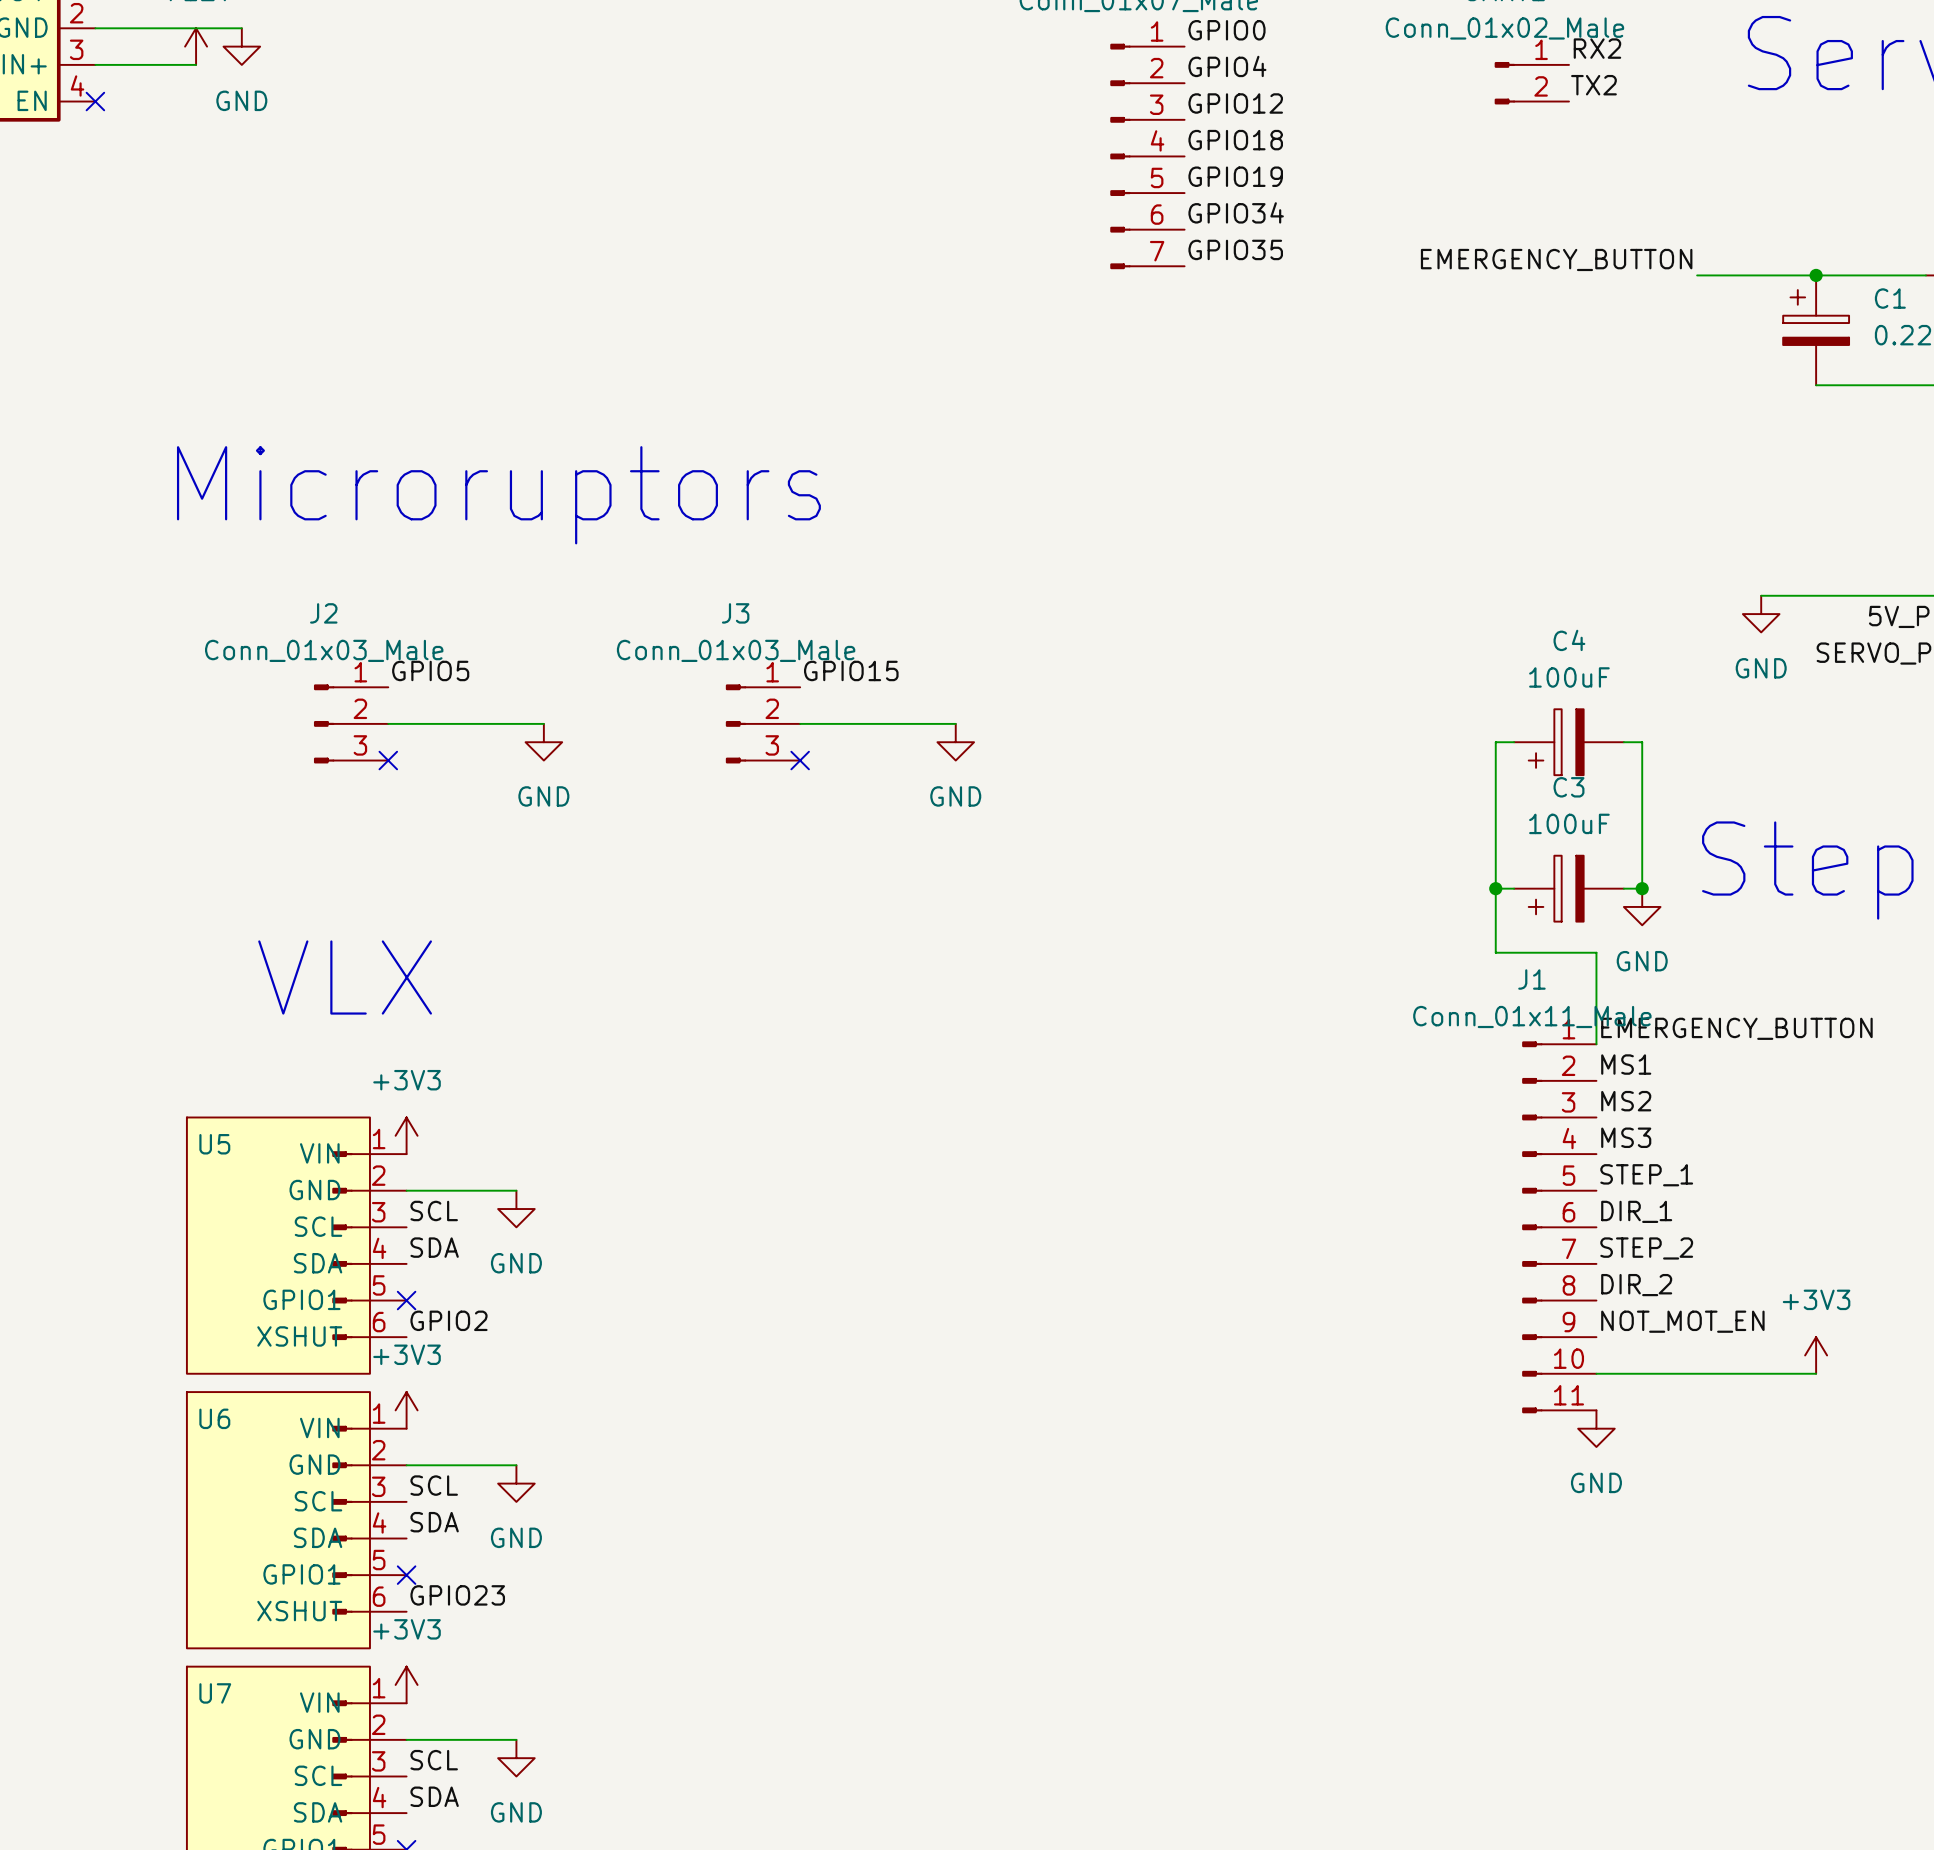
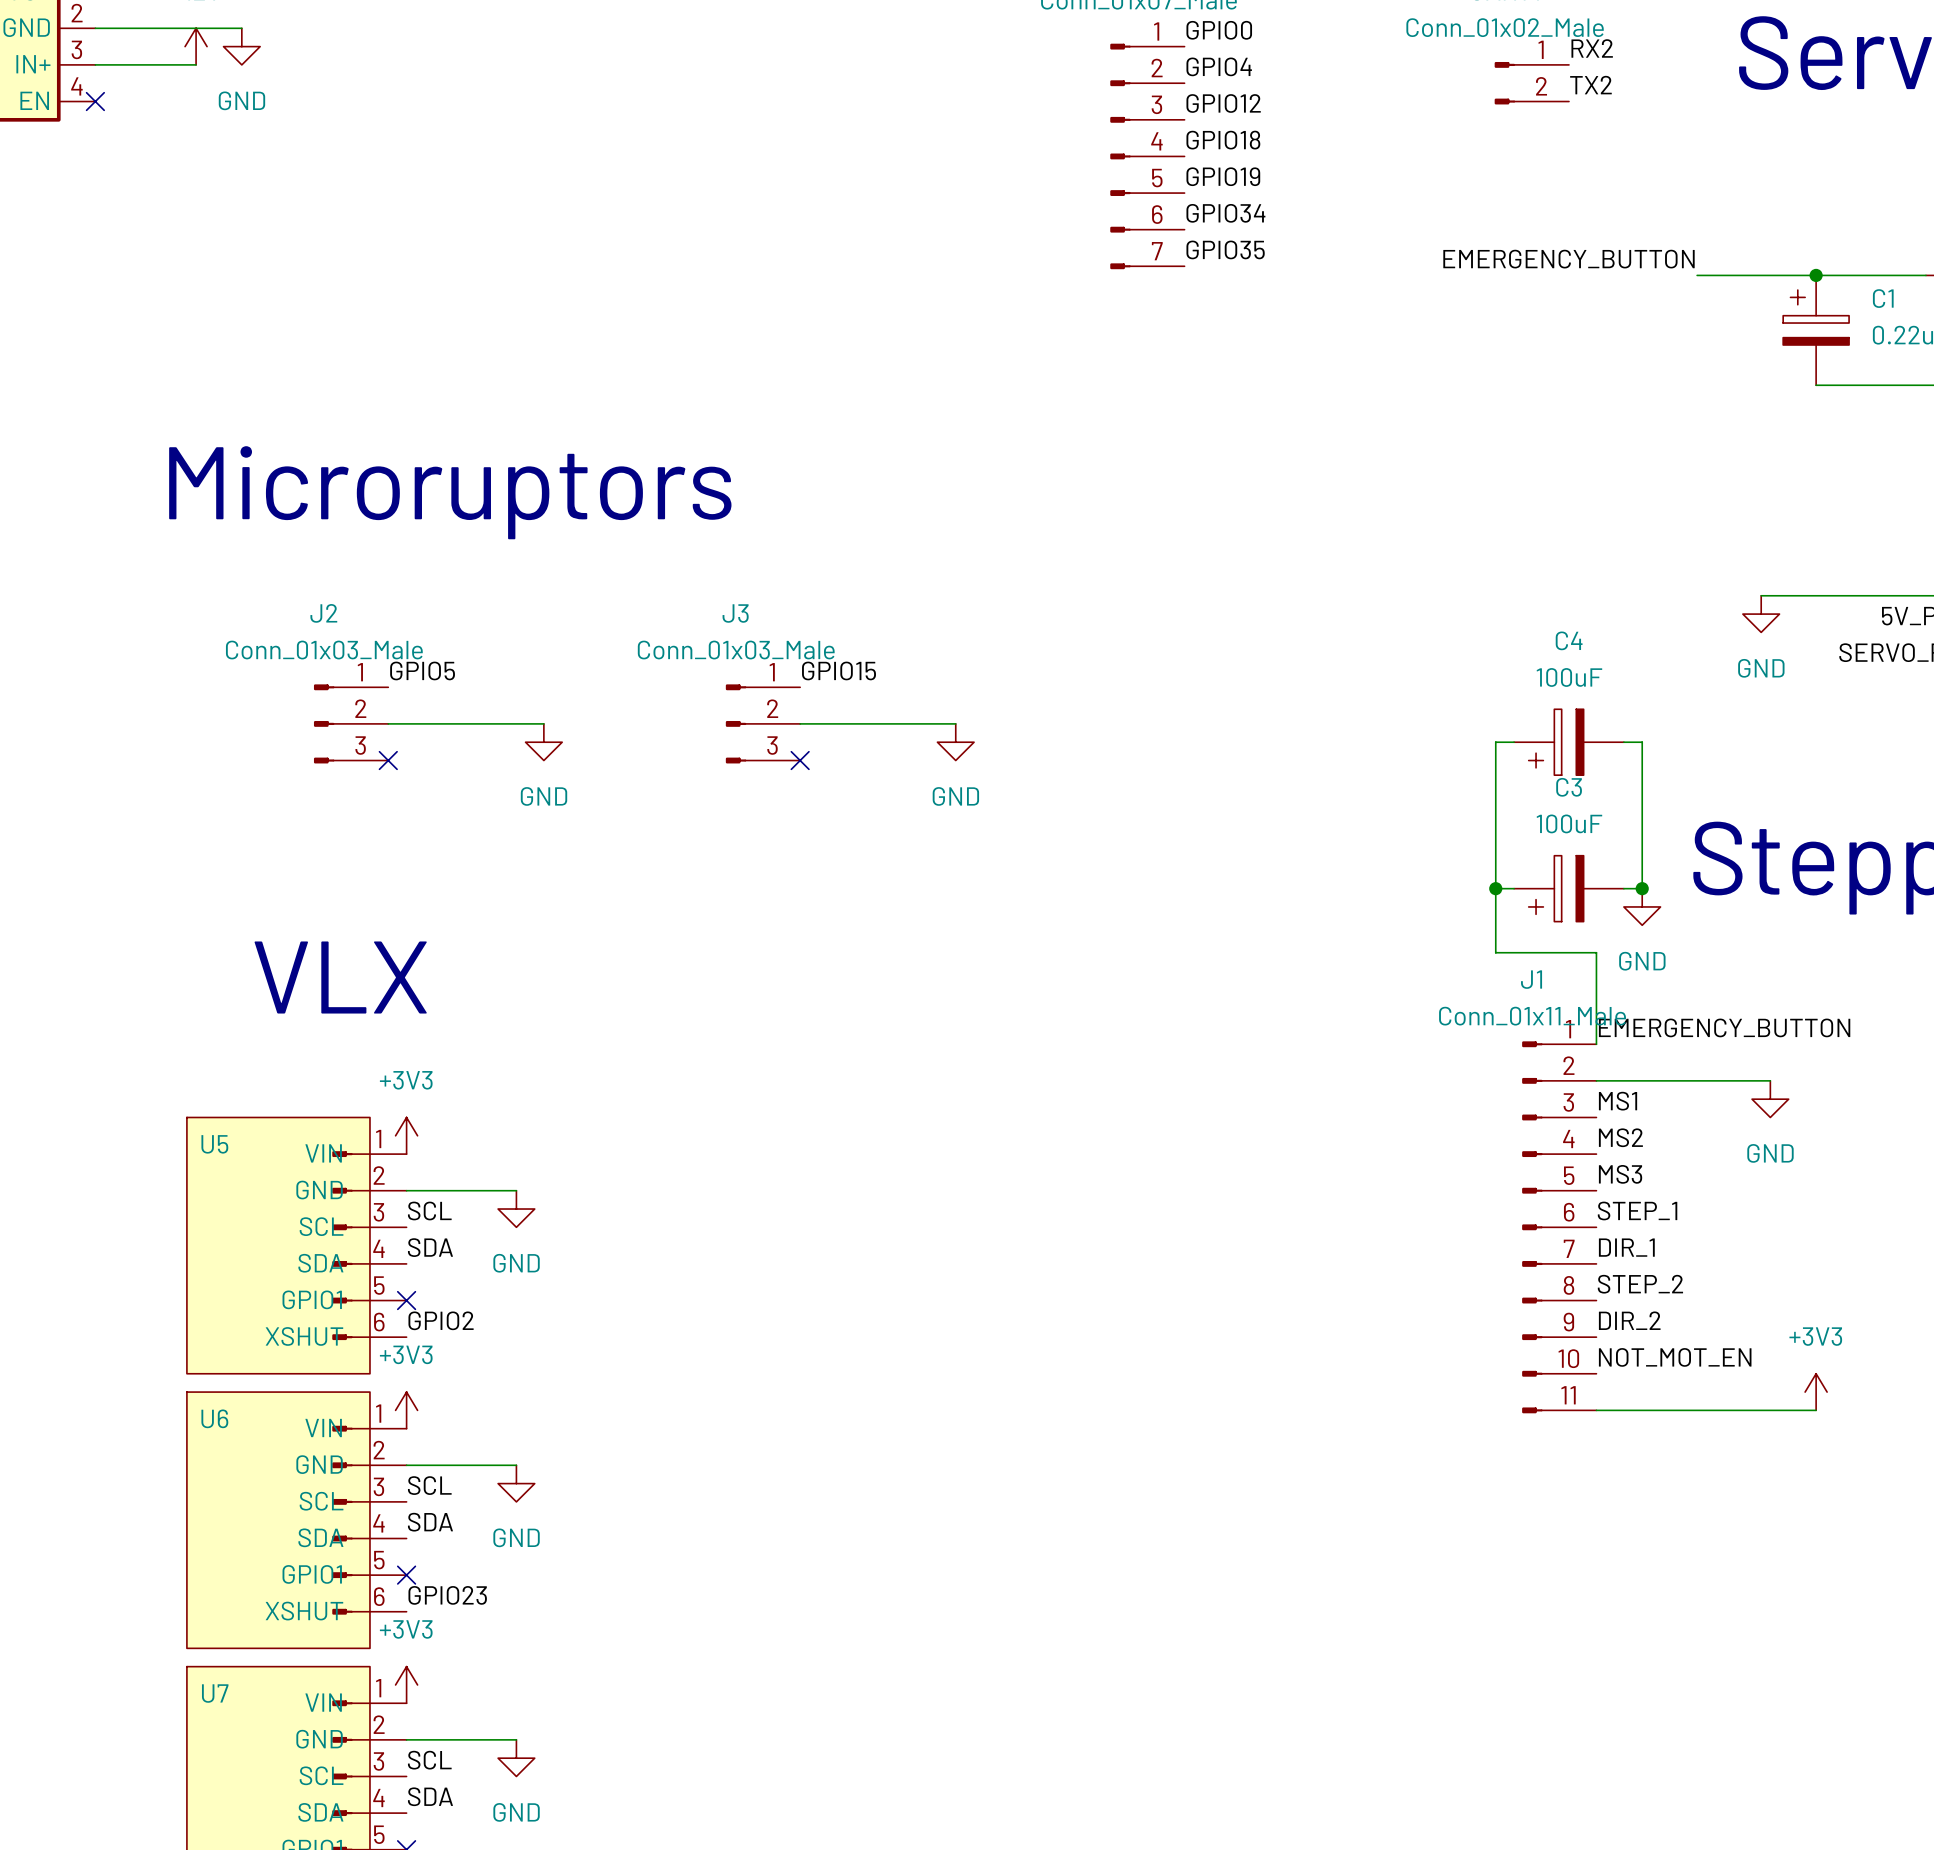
label: MS1 (1626, 1064) -> none
wire: none -> (1596, 1080) (1770, 1080)
power symbol: none -> GND (1770, 1099)
label: MS2 (1626, 1101) -> MS1 (1618, 1101)
label: MS3 (1626, 1137) -> MS2 (1620, 1137)
label: STEP_1 (1646, 1175) -> MS3 (1620, 1174)
label: DIR_1 (1636, 1211) -> STEP_1 (1637, 1210)
label: STEP_2 (1646, 1248) -> DIR_1 (1626, 1247)
label: DIR_2 (1636, 1285) -> STEP_2 (1640, 1284)
label: NOT_MOT_EN (1682, 1321) -> DIR_2 (1629, 1320)
power symbol position: +3V3 (1816, 1355) -> +3V3 (1816, 1392)
label: none -> NOT_MOT_EN (1675, 1357)
wire: (1596, 1373) (1816, 1373) -> (1596, 1410) (1816, 1410)
power symbol: GND (1596, 1428) -> none

